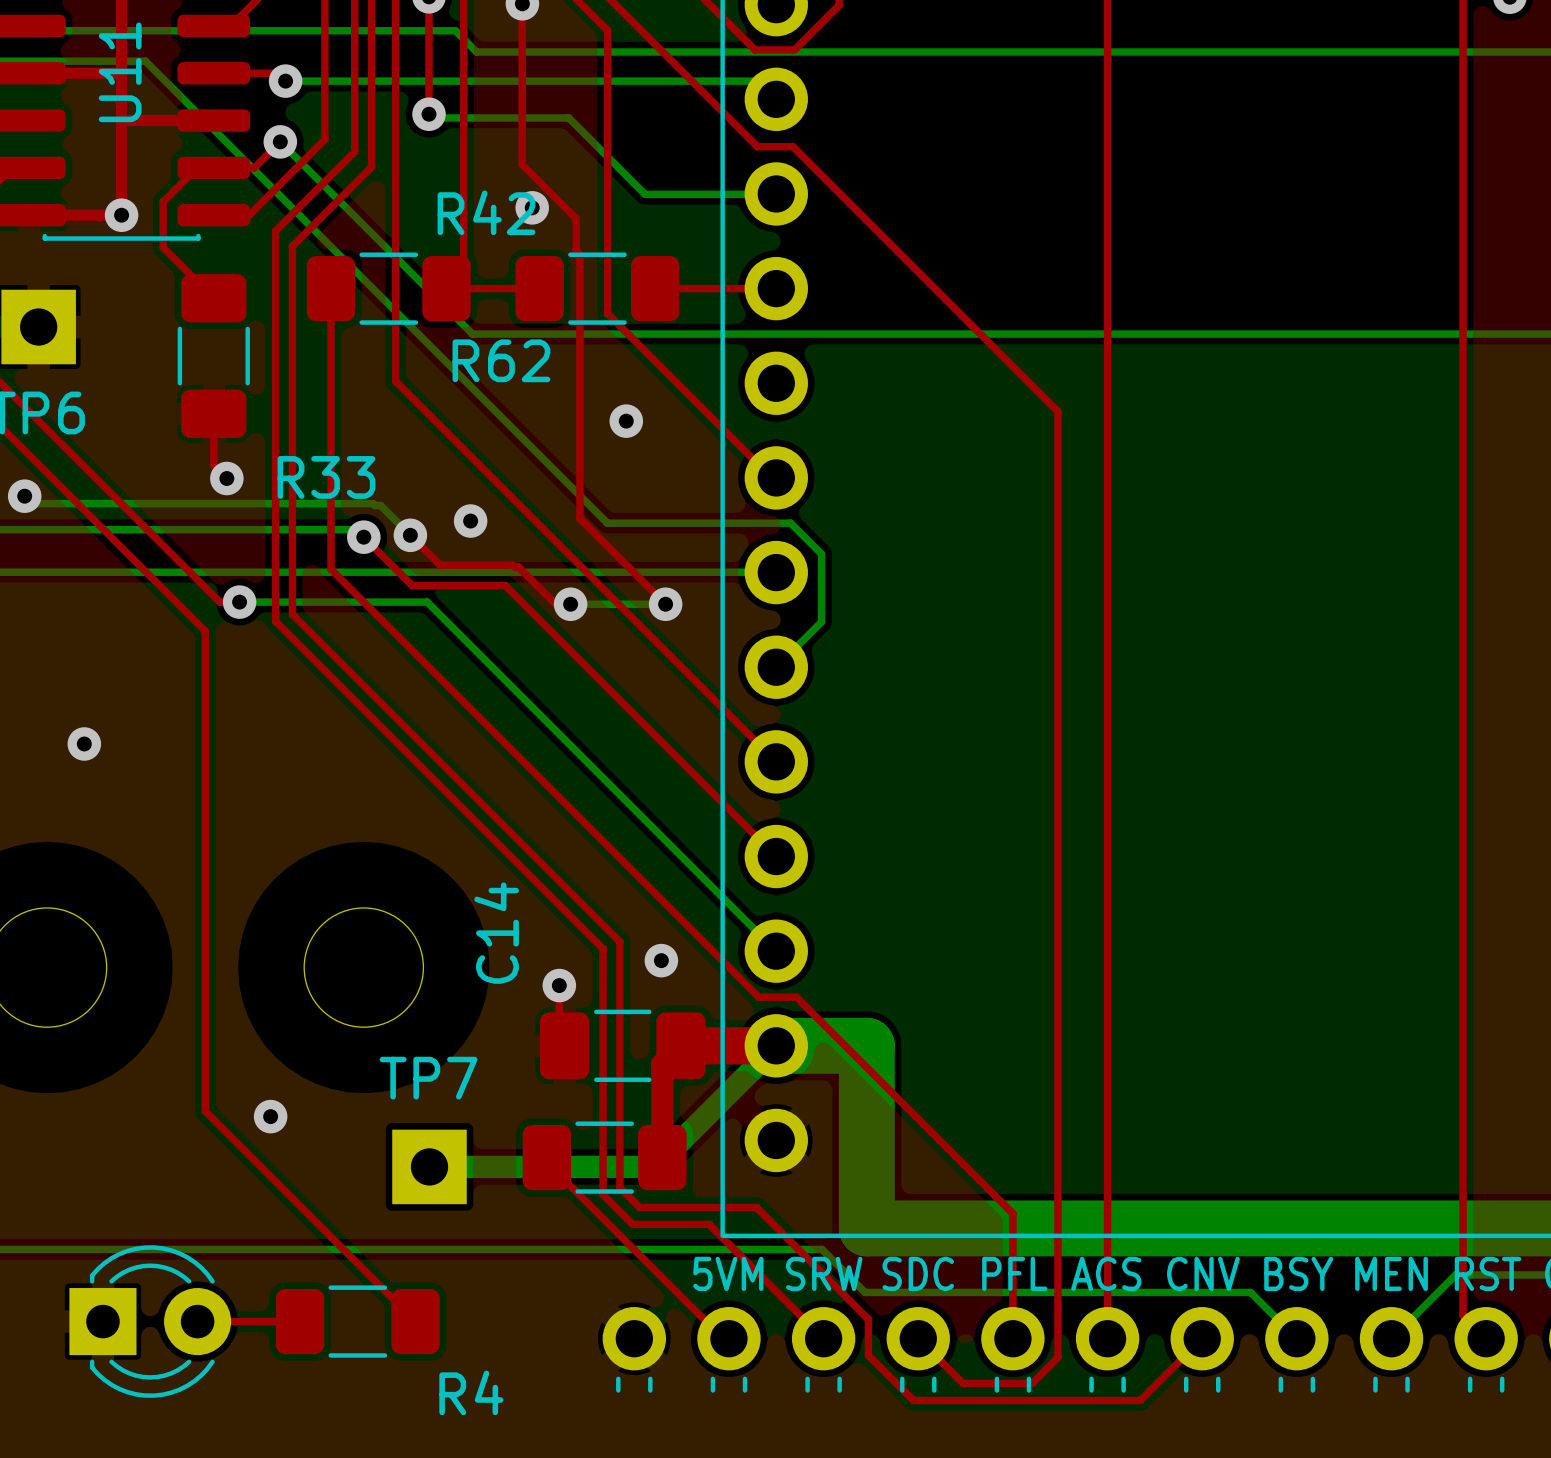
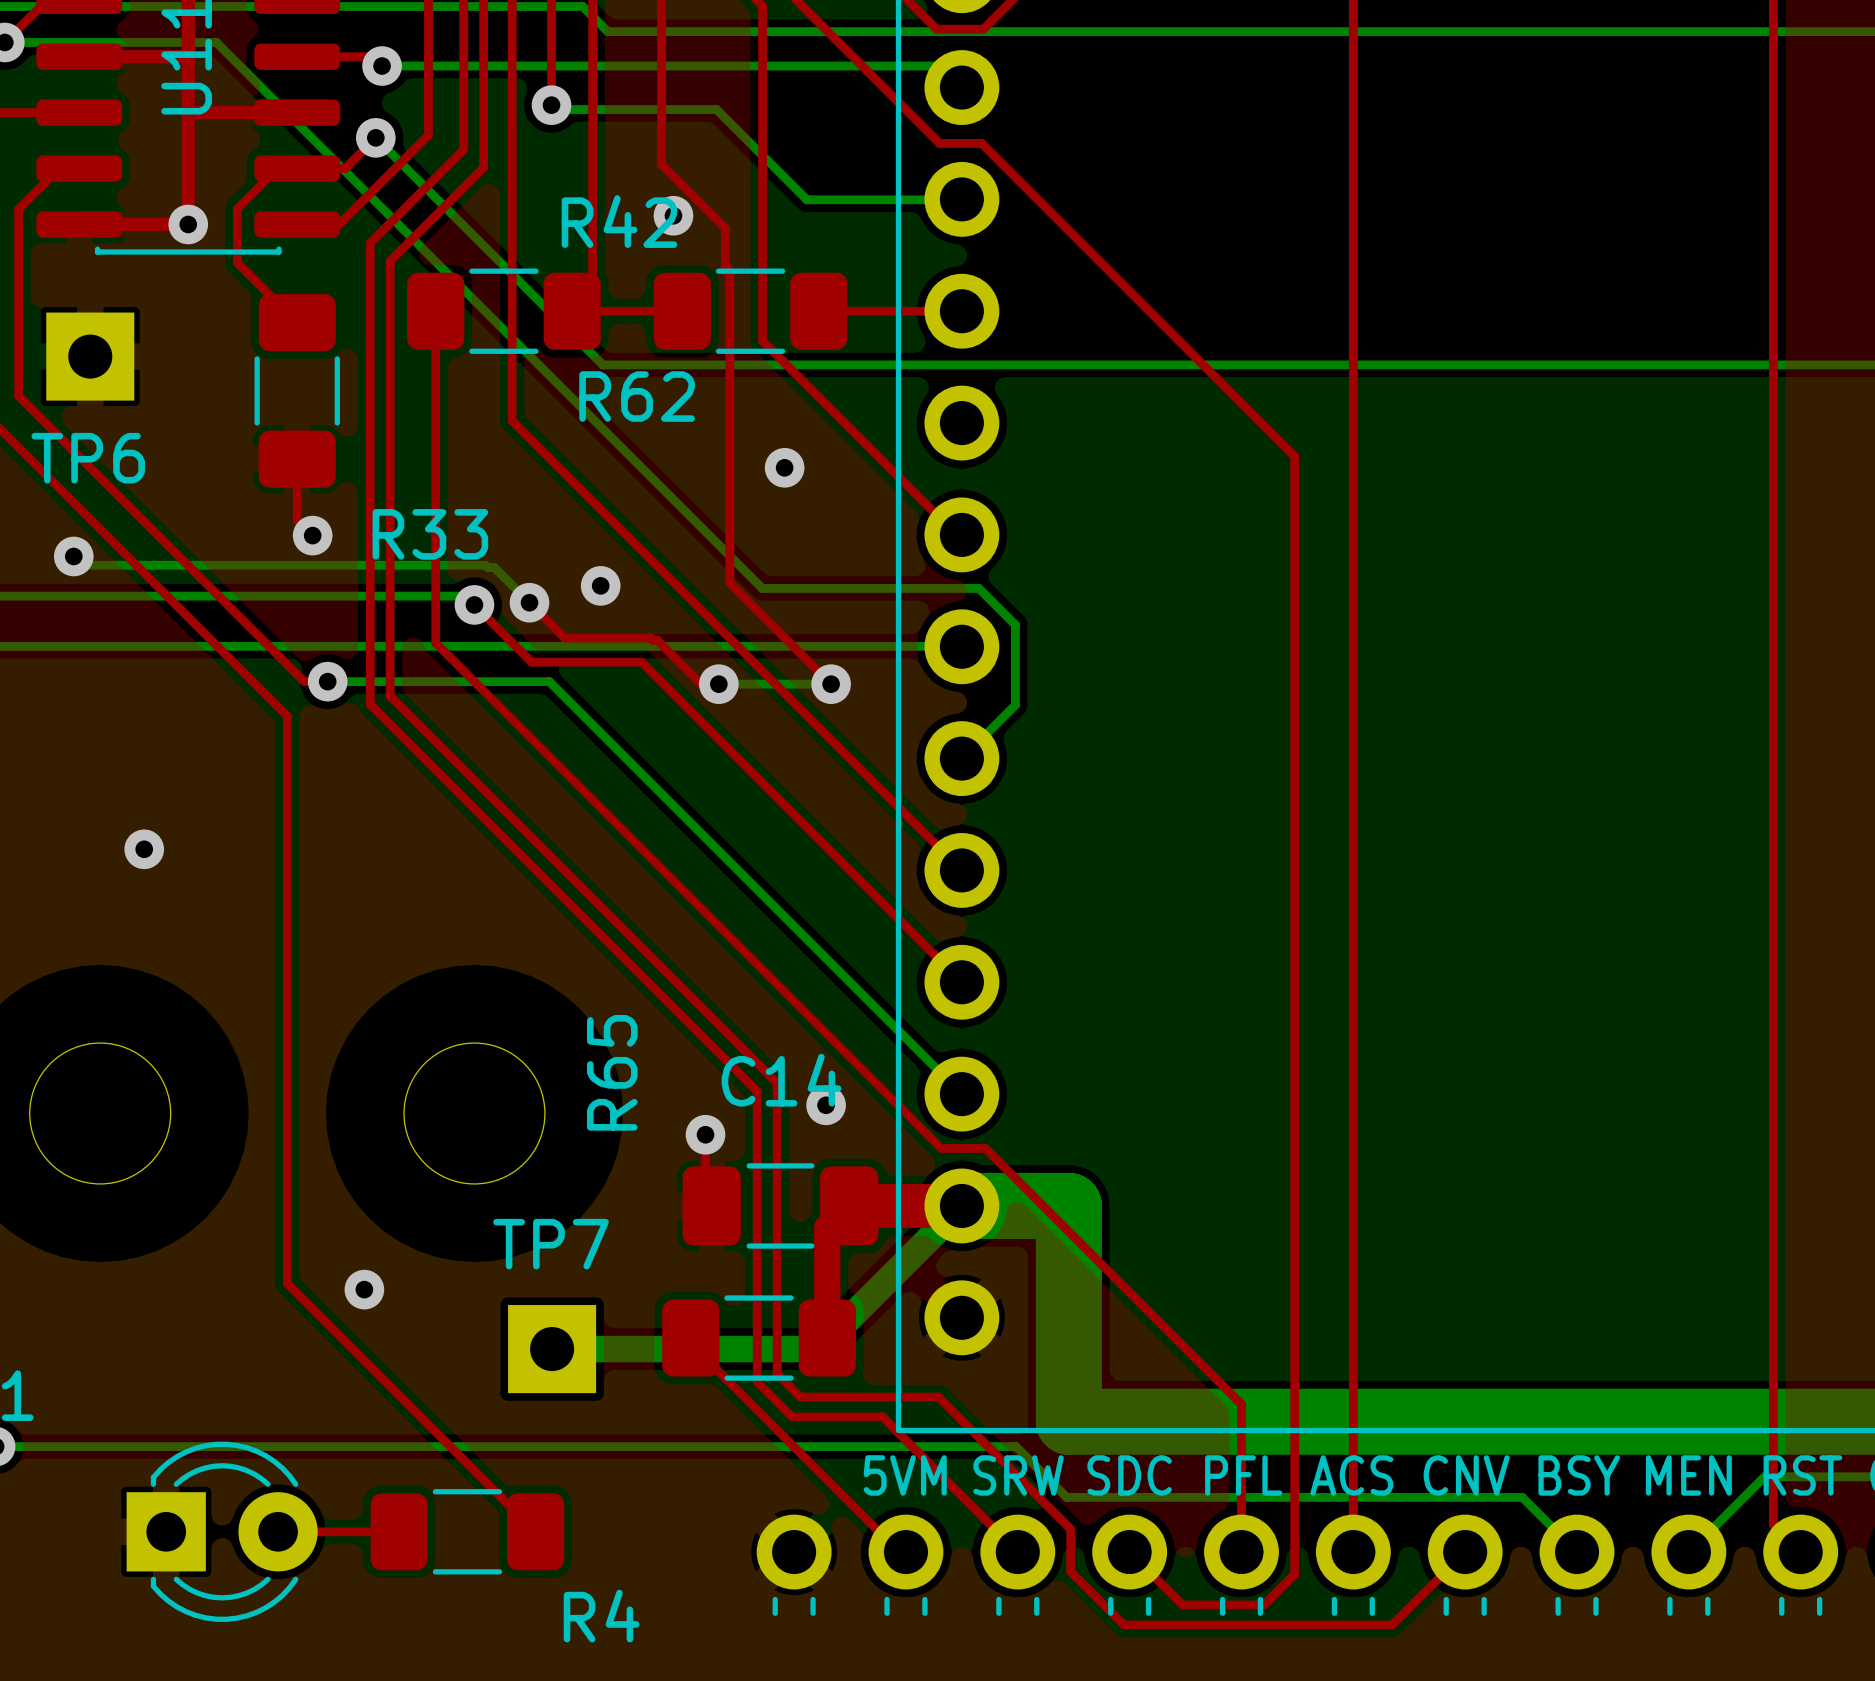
R65 name: none -> R65 (612, 1072)
C14 name rotation: 0° (496, 933) -> 90° clockwise (781, 1080)

